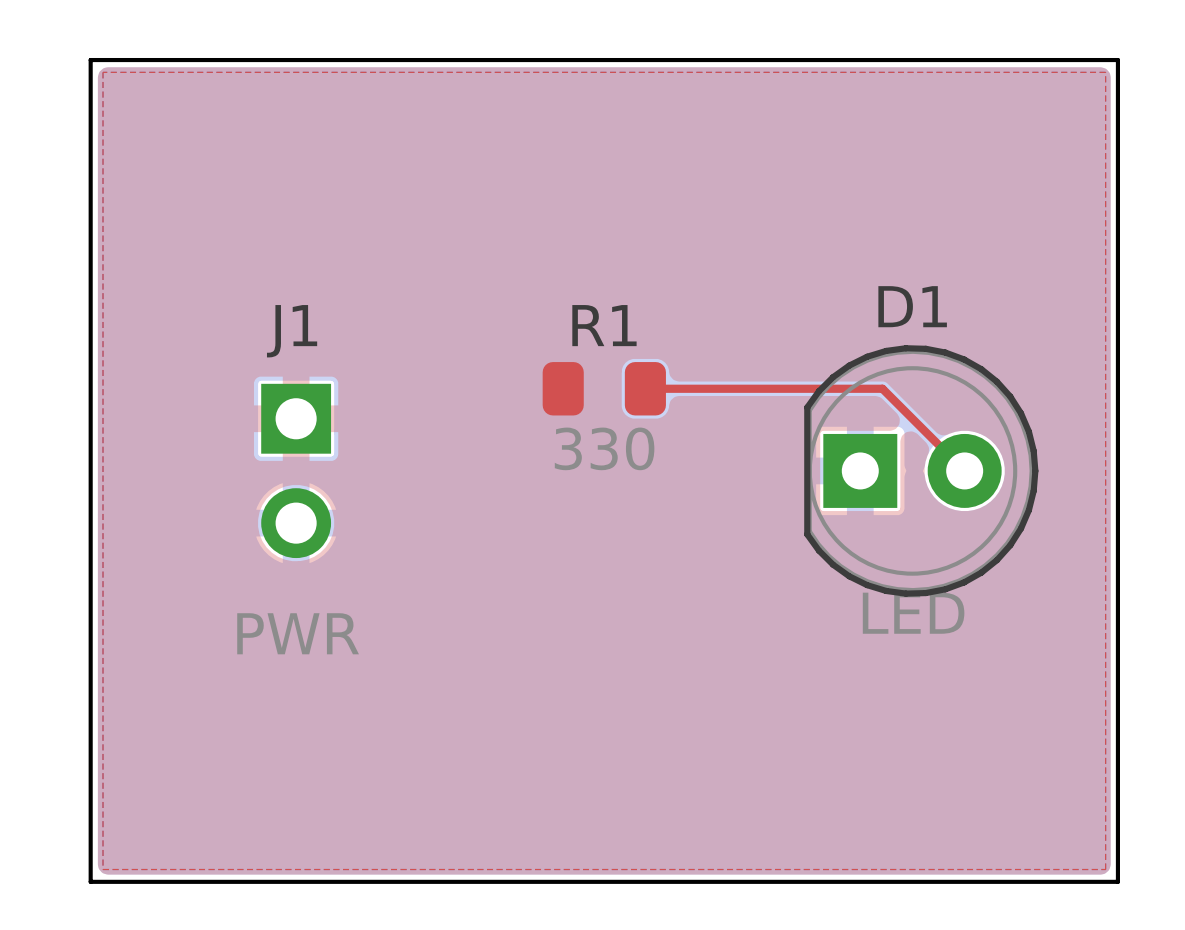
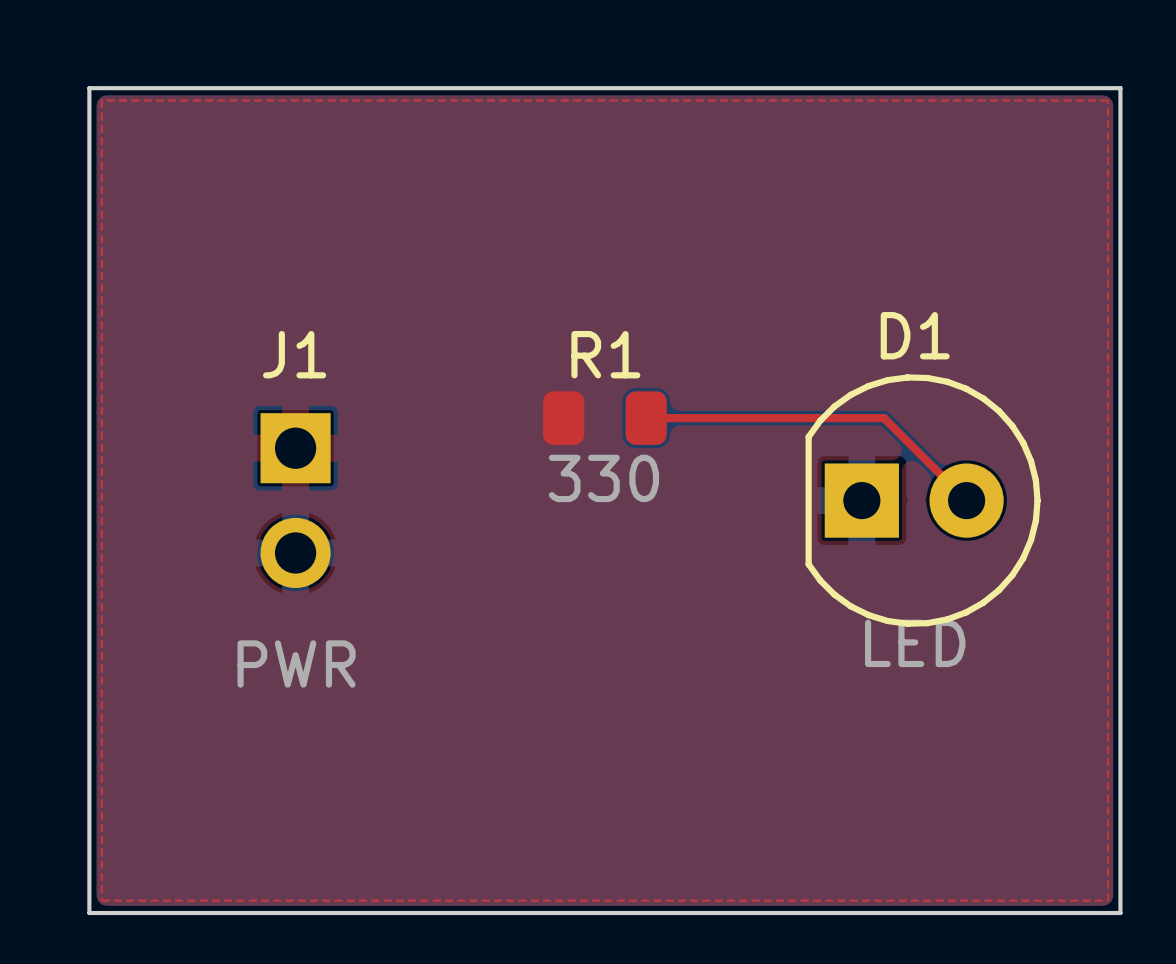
D1 footprint: [804, 345, 1039, 597] -> [805, 374, 1041, 627]

